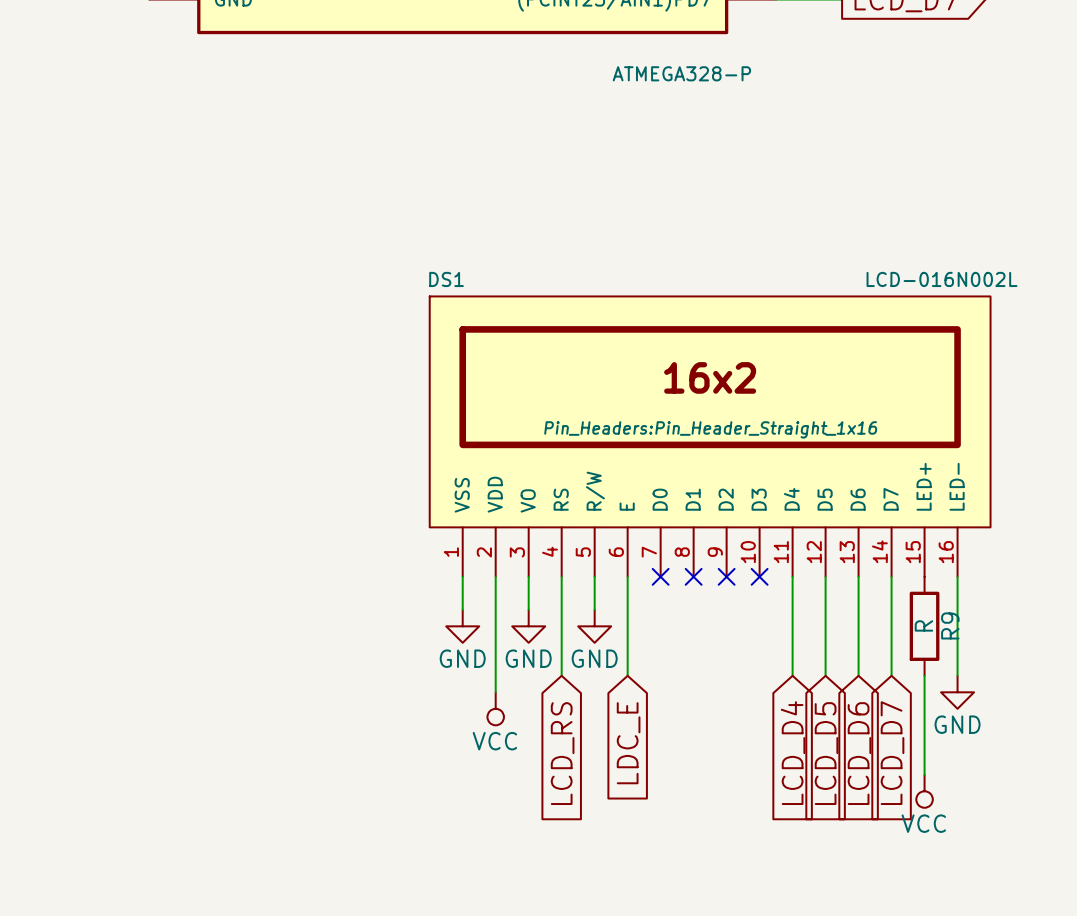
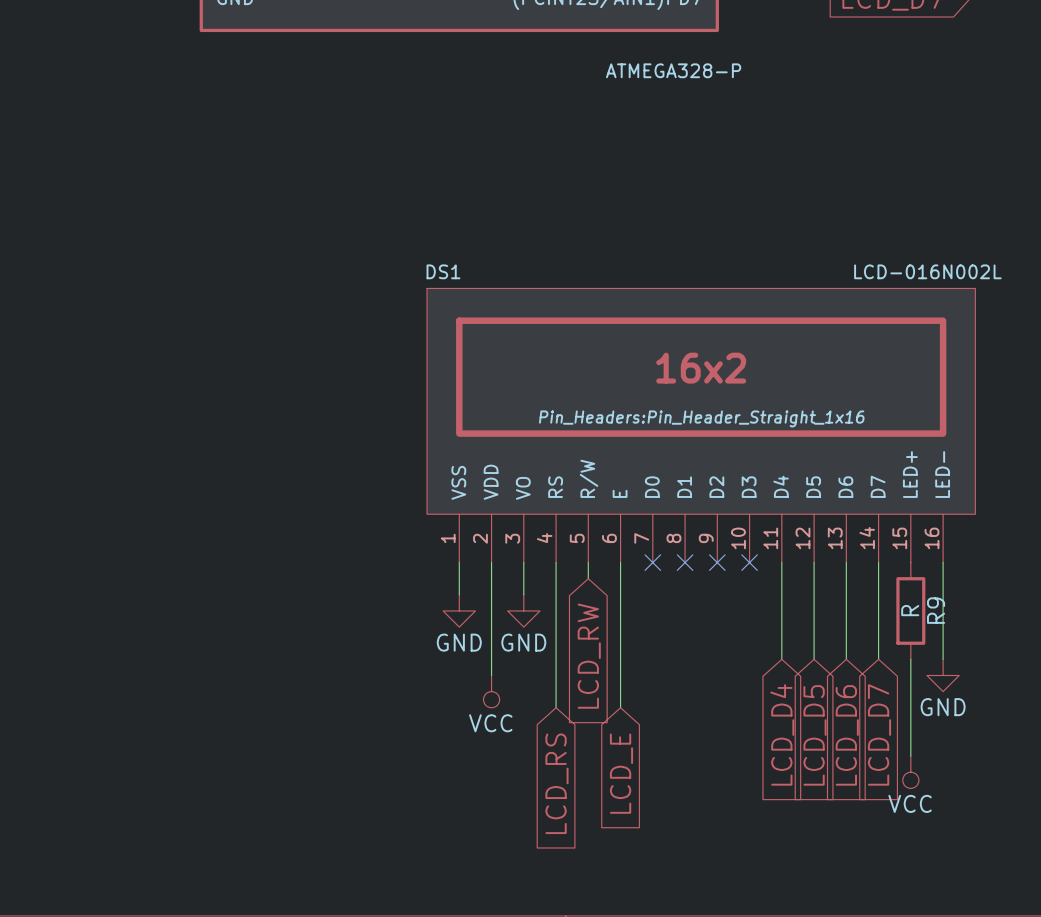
wire: (594, 593) (594, 609) -> none
power symbol: GND (594, 626) -> none
global label: none -> LCD_RW (589, 656)
wire: none -> (556, 659) (556, 707)
wire: none -> (620, 659) (620, 707)
global label: LDC_E (628, 743) -> LCD_E (621, 773)
global label position: LCD_RS (562, 753) -> LCD_RS (556, 783)

